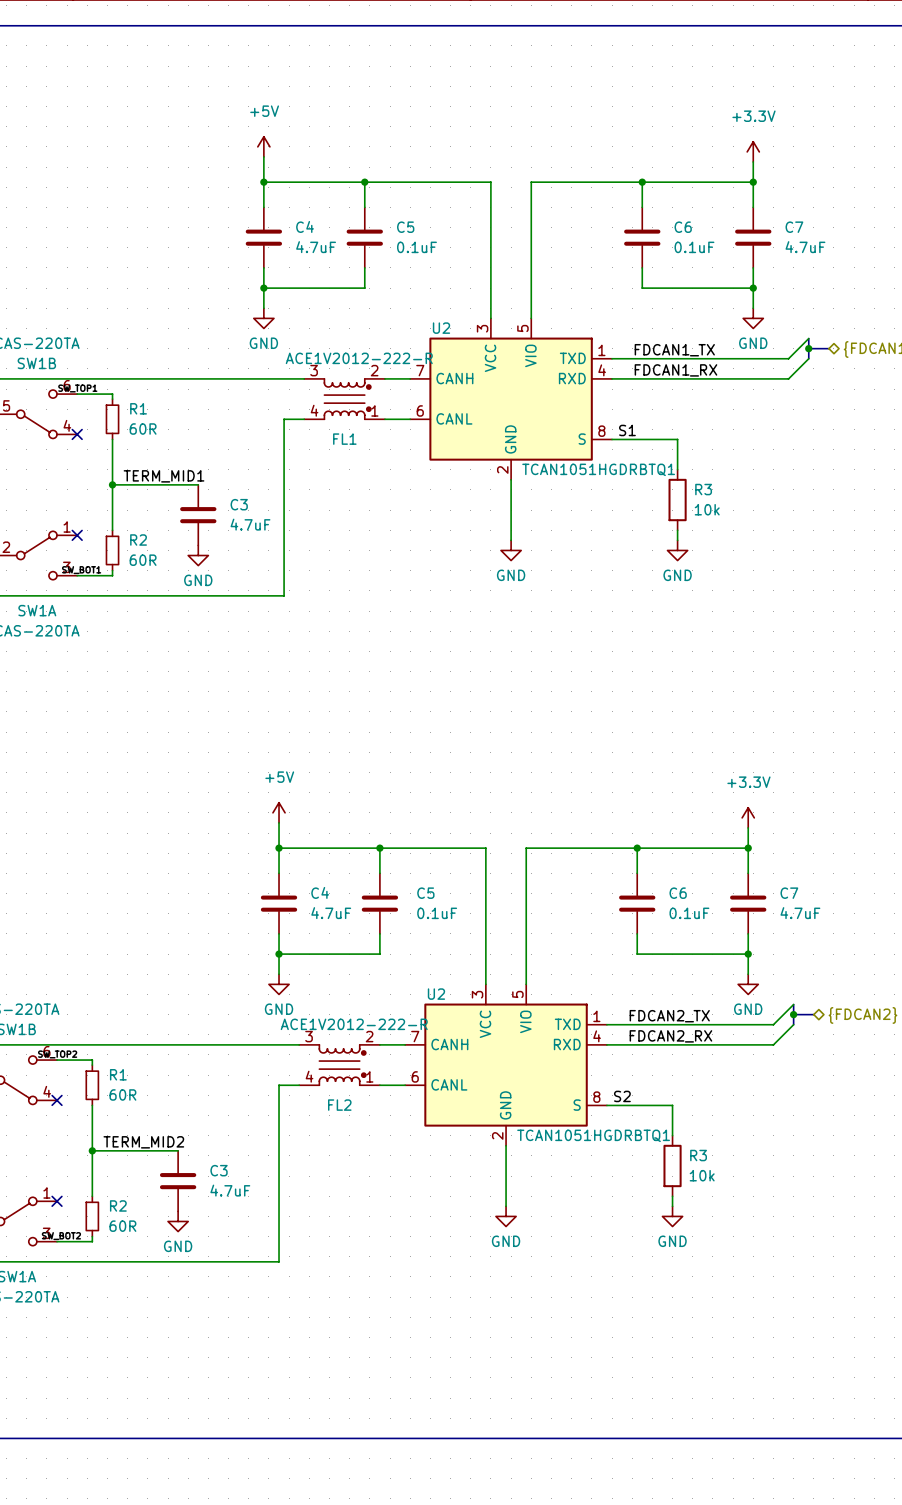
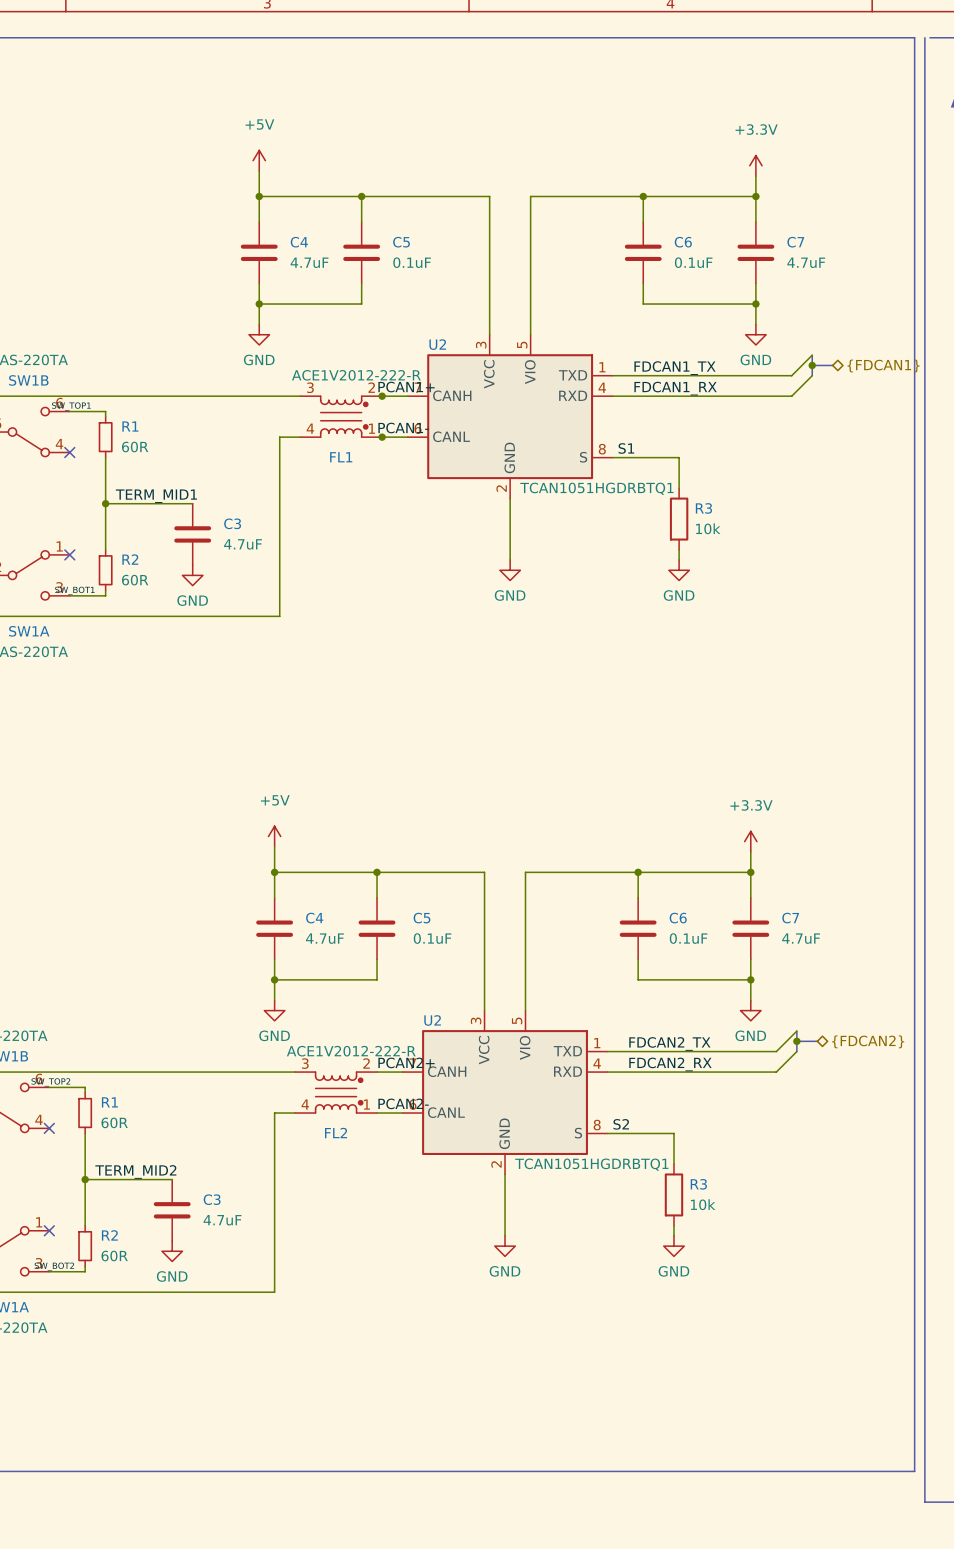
label: none -> PCAN1+ (406, 387)
junction: none -> (382, 396)
label: none -> PCAN1- (403, 428)
junction: none -> (382, 437)
label: none -> PCAN2+ (406, 1062)
label: none -> PCAN2- (403, 1103)

